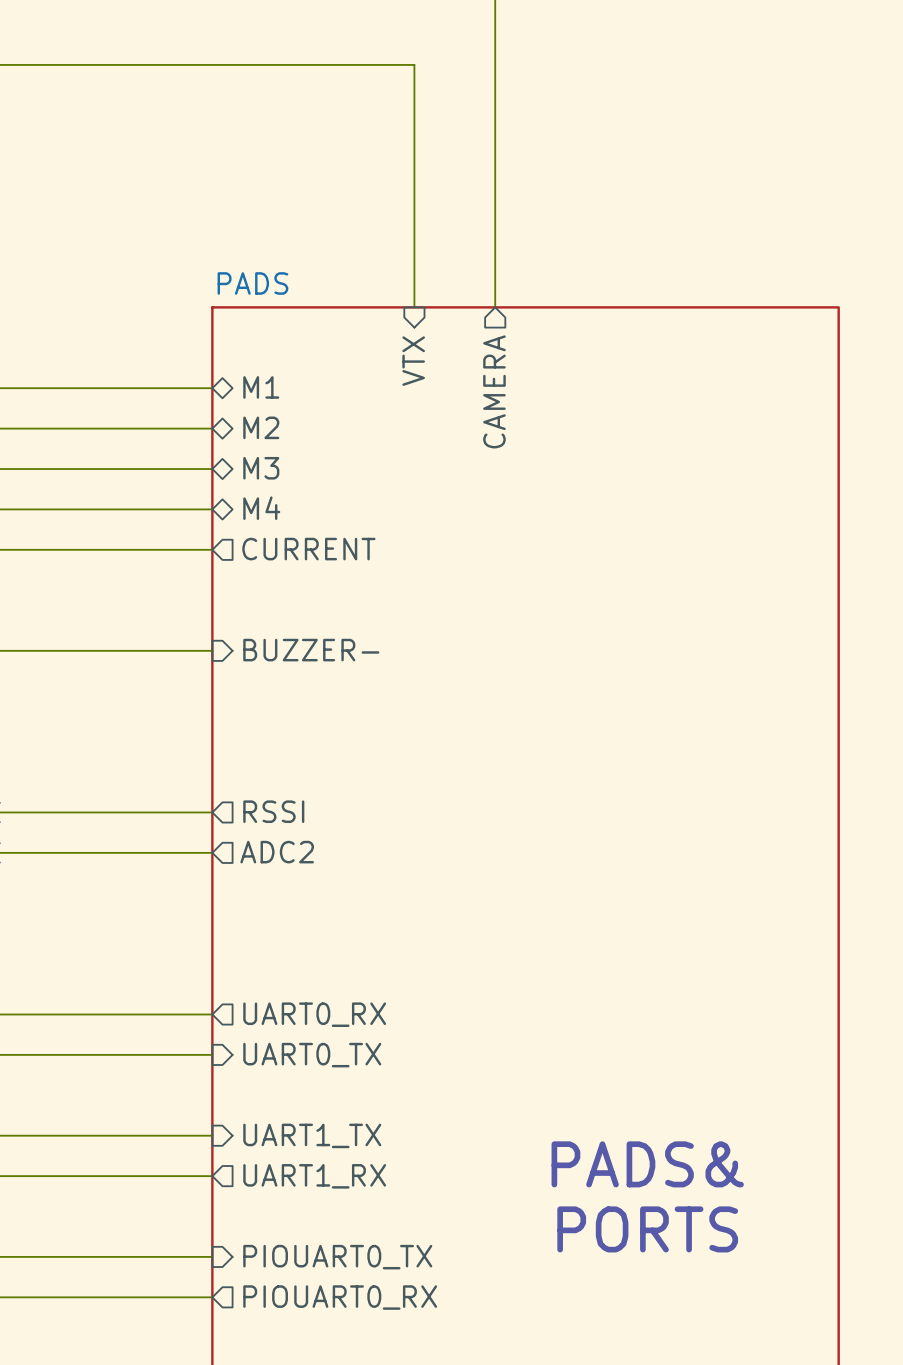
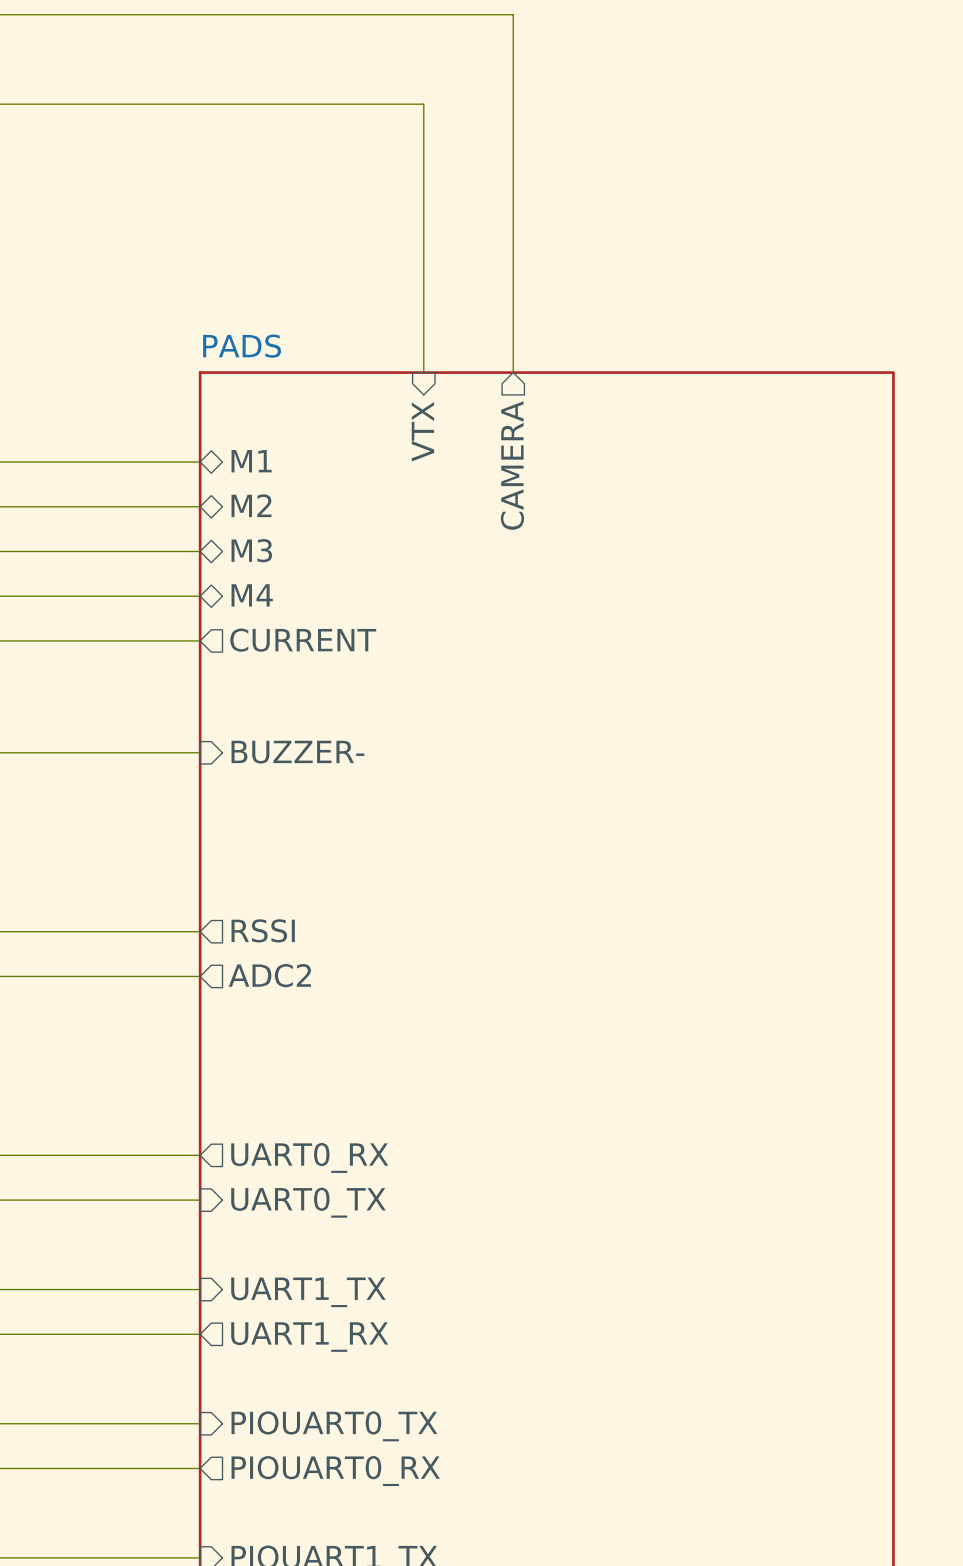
text: PADS& (647, 1164) -> none
text: PORTS (647, 1229) -> none

